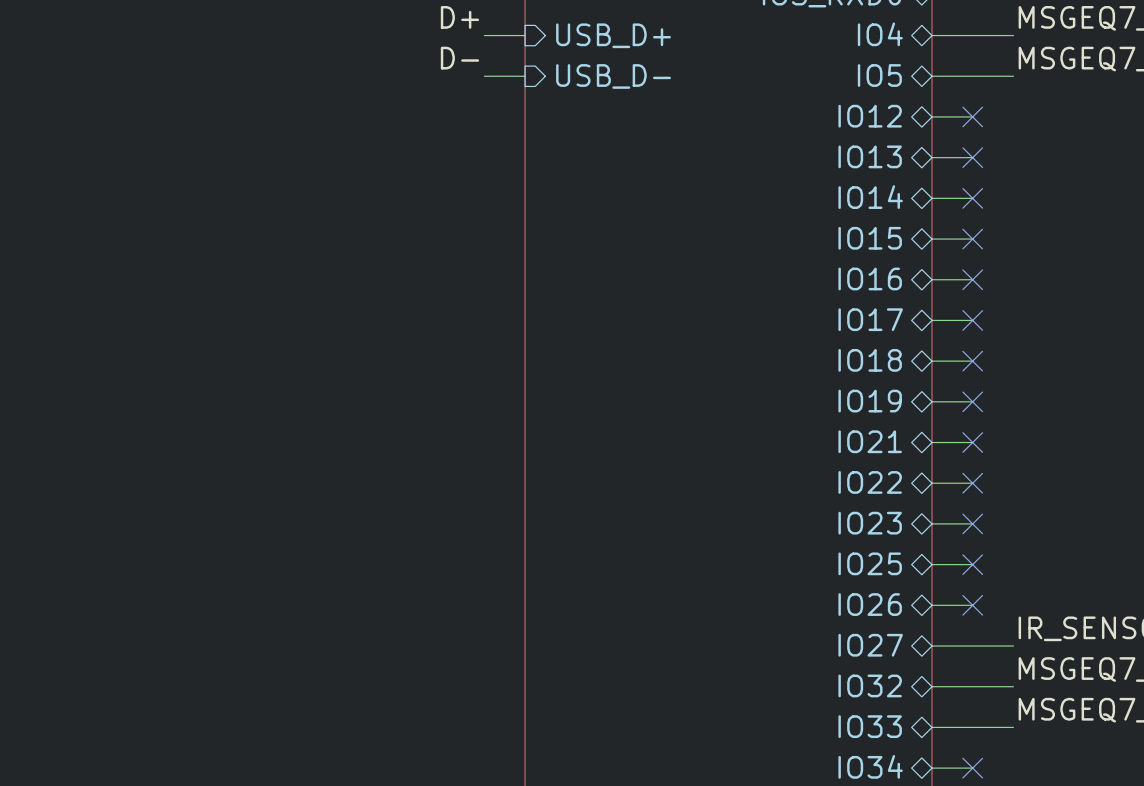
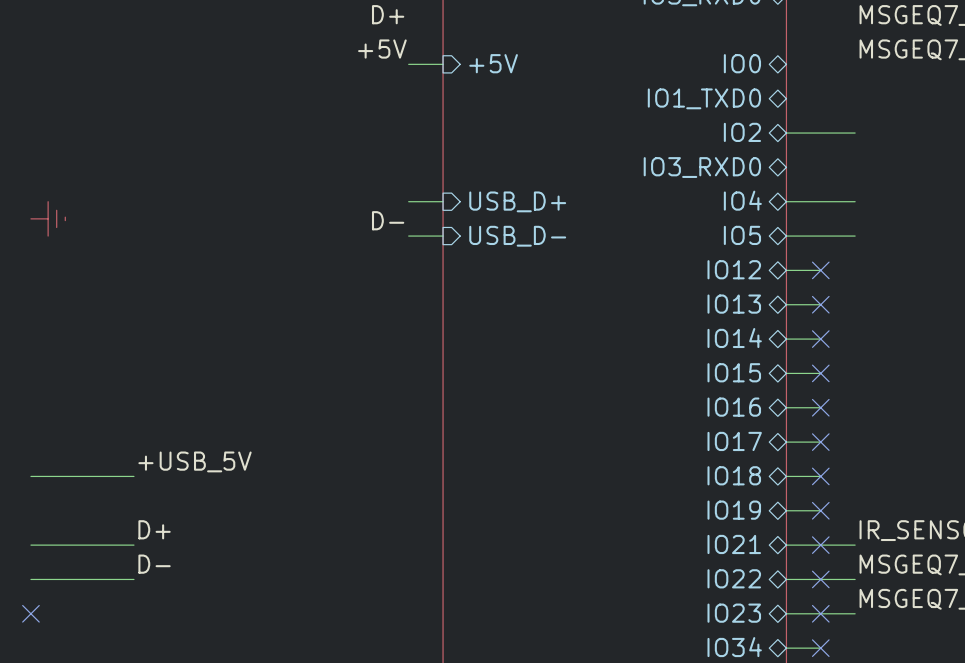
sheet pin: IO4 (880, 34) -> none
wire: (484, 35) (525, 35) -> (408, 201) (443, 201)
sheet pin position: USB_D+ (613, 35) -> USB_D+ (517, 201)
wire: (932, 35) (1013, 35) -> none
label: D- (459, 58) -> +5V (382, 49)
sheet pin: IO5 (879, 75) -> IO0 (742, 63)
sheet pin: USB_D- (613, 76) -> +5V (493, 63)
wire: (932, 76) (1013, 76) -> none
sheet pin: IO12 (870, 116) -> IO1_TXD0 (704, 98)
wire: (932, 116) (972, 116) -> (820, 133) (855, 133)
no-connect mark: (972, 116) -> none
sheet pin: IO13 (870, 156) -> IO2 (742, 132)
no-connect mark: (972, 157) -> none
sheet pin: IO14 (870, 197) -> IO3_RXD0 (702, 167)
wire: (932, 198) (972, 198) -> (820, 201) (855, 201)
no-connect mark: (972, 198) -> none
sheet pin: IO15 (870, 238) -> IO4 (742, 200)
no-connect mark: (972, 239) -> none
power symbol: none -> (48, 218)
label: none -> D- (388, 220)
sheet pin: IO16 (870, 278) -> IO5 (742, 235)
wire: none -> (408, 236) (443, 236)
sheet pin: none -> USB_D- (517, 236)
wire: none -> (820, 236) (855, 236)
no-connect mark: (972, 279) -> none
sheet pin: IO17 (870, 319) -> IO12 (734, 269)
sheet pin: IO18 (870, 360) -> IO13 (734, 304)
sheet pin: IO19 (870, 401) -> IO14 (734, 338)
sheet pin: IO21 (870, 441) -> IO15 (734, 372)
sheet pin: IO22 (870, 482) -> IO16 (734, 407)
sheet pin: IO23 (870, 523) -> IO17 (734, 441)
label: none -> +USB_5V (195, 461)
sheet pin: IO25 (870, 563) -> IO18 (734, 475)
wire: none -> (30, 476) (133, 476)
sheet pin: IO26 (870, 604) -> IO19 (734, 510)
label: none -> D+ (154, 529)
sheet pin: IO27 (870, 645) -> IO21 (734, 544)
wire: none -> (30, 545) (133, 545)
no-connect mark: none -> (820, 545)
label: none -> D- (154, 564)
sheet pin: IO32 (870, 685) -> IO22 (734, 578)
wire: none -> (30, 579) (133, 579)
no-connect mark: none -> (820, 579)
sheet pin: IO33 (870, 726) -> IO23 (734, 613)
no-connect mark: none -> (30, 613)
no-connect mark: none -> (820, 613)

